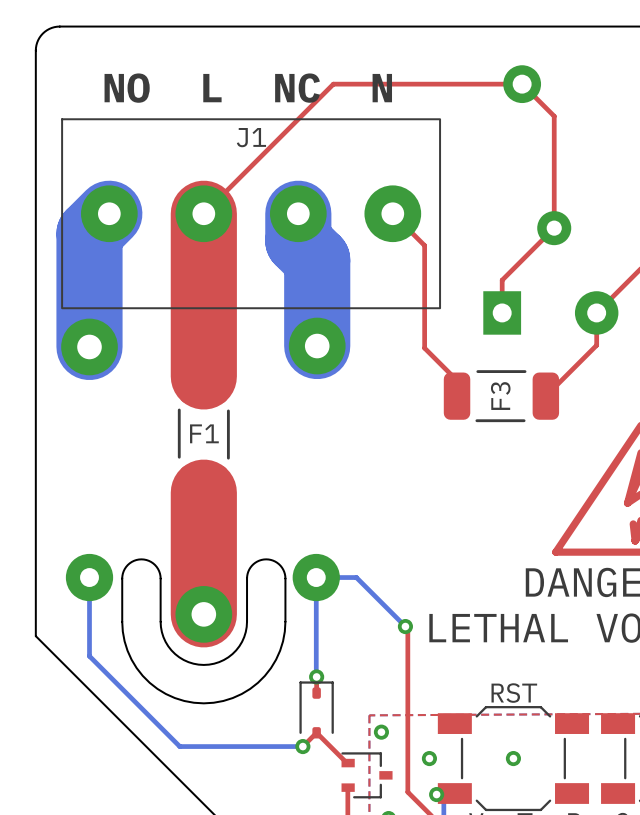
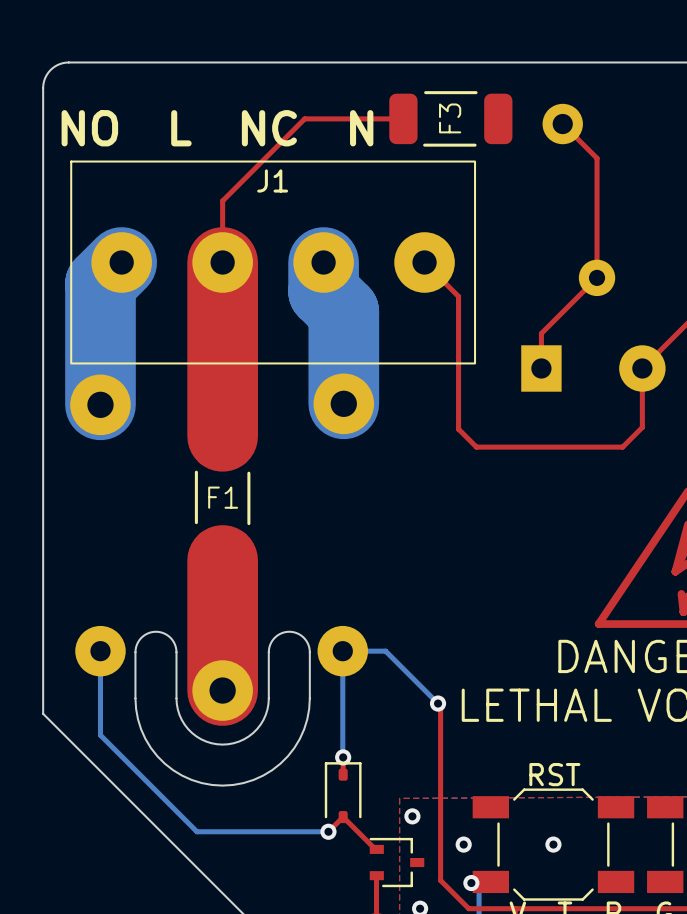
top track: (522, 84) (333, 84) (203, 213) -> (403, 118) (304, 118) (222, 200) (222, 262)
text position: NO L NC N (248, 88) -> NO L NC N (217, 128)
top track: (596, 345) (545, 396) -> (642, 403) (642, 427) (622, 447) (476, 447) (458, 429) (458, 406)
top track: (424, 348) (457, 380) (457, 396) -> none
F3 position: (501, 396) -> (450, 118)

